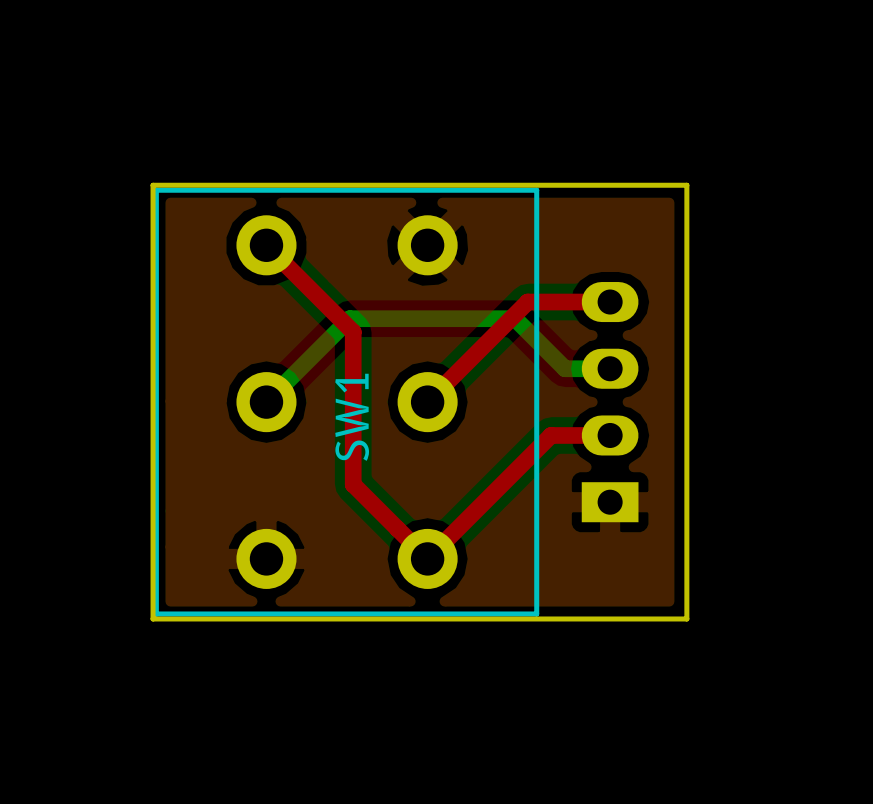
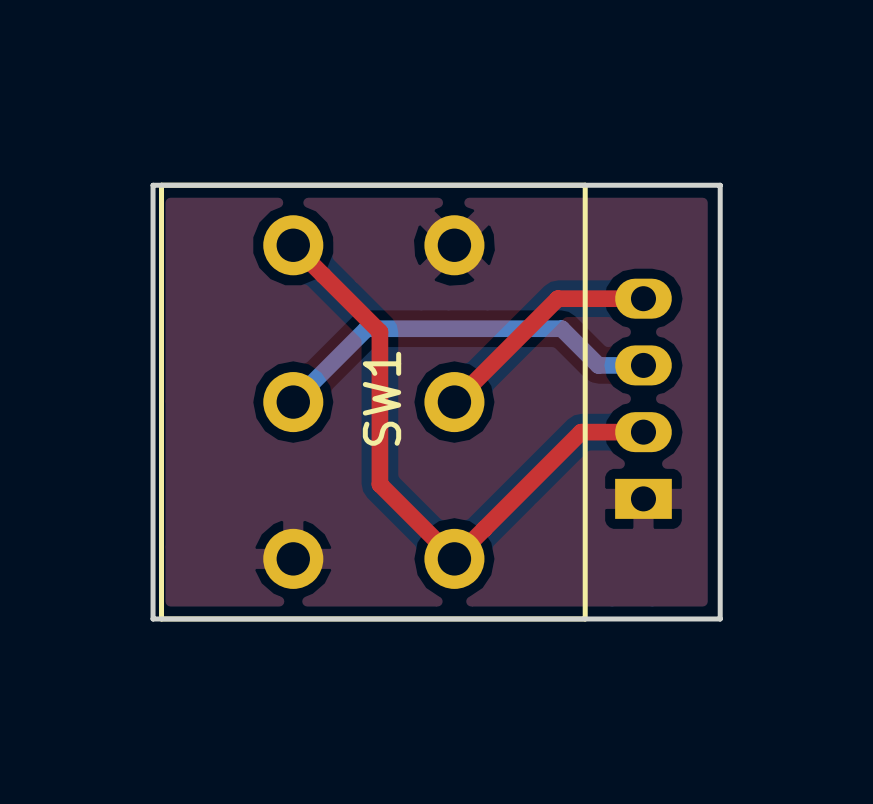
board edge: (686, 185) (686, 618) -> (686, 185) (720, 185) (720, 618) (686, 618)
SW1 footprint: [153, 187, 540, 617] -> [158, 182, 588, 622]
top track: (266, 245) (353, 332) (353, 484) (427, 558) (551, 435) (610, 435) -> none
top track: none -> (293, 245) (379, 331) (379, 484) (454, 558) (581, 432) (643, 432)
top track: none -> (643, 298) (557, 298) (454, 402)
top track: (610, 302) (527, 302) (427, 402) -> none
bottom track: none -> (643, 365) (598, 365) (561, 328) (366, 328) (293, 402)
bottom track: (610, 368) (565, 368) (515, 318) (349, 318) (266, 402) -> none
part position: (610, 402) -> (643, 398)

